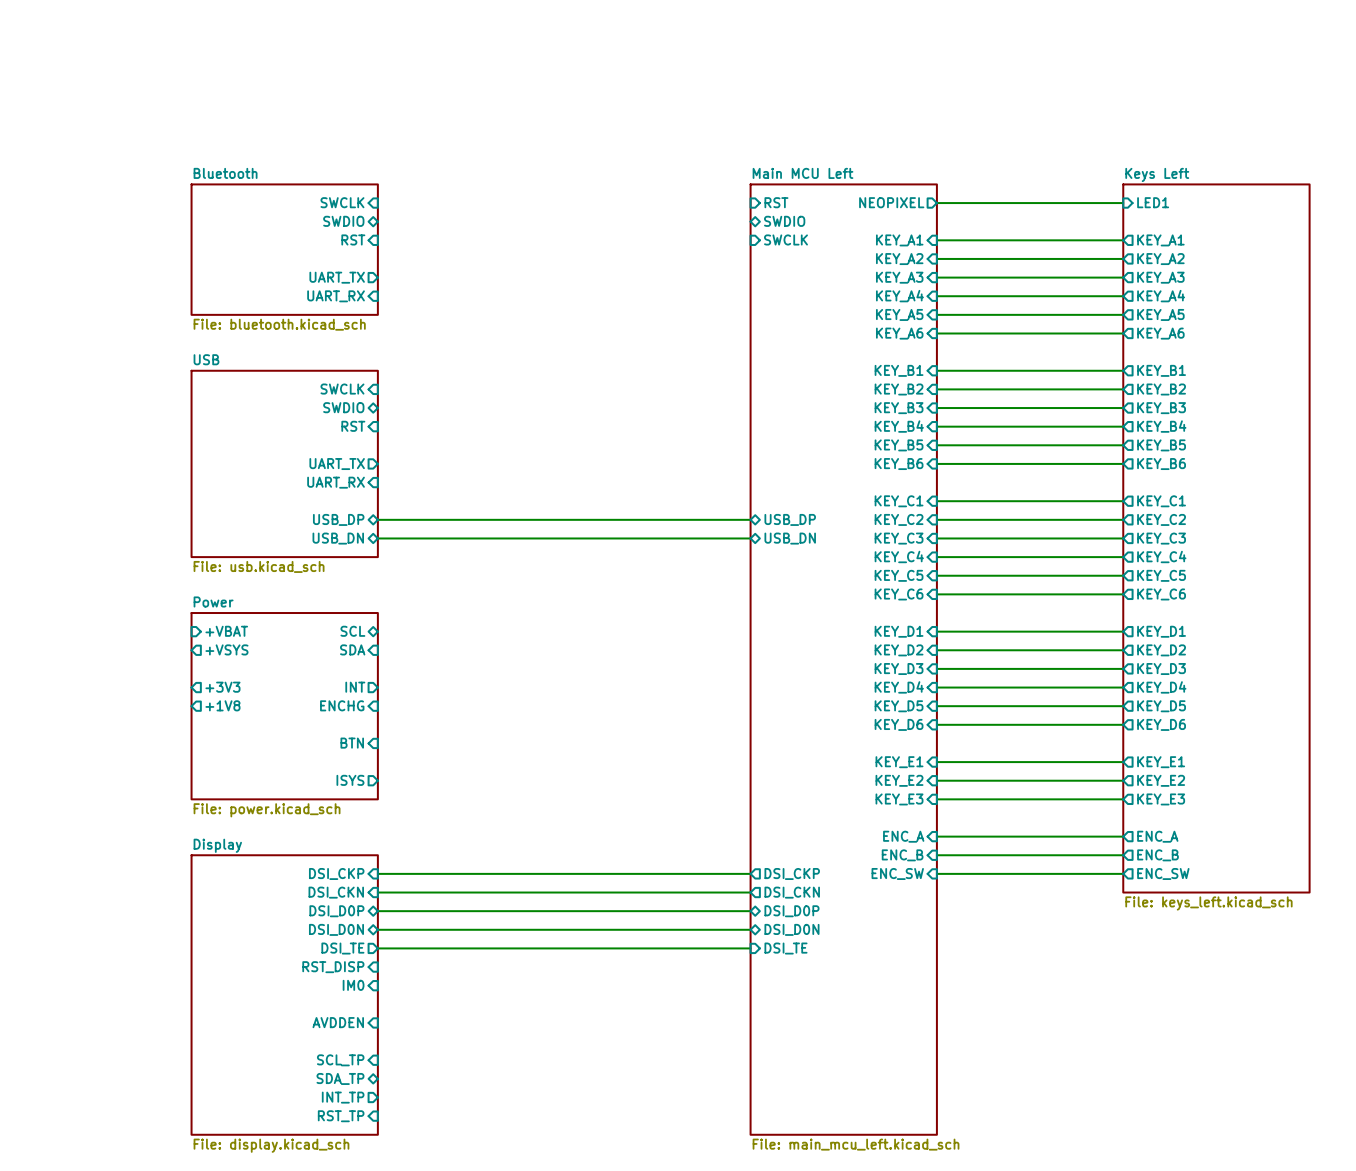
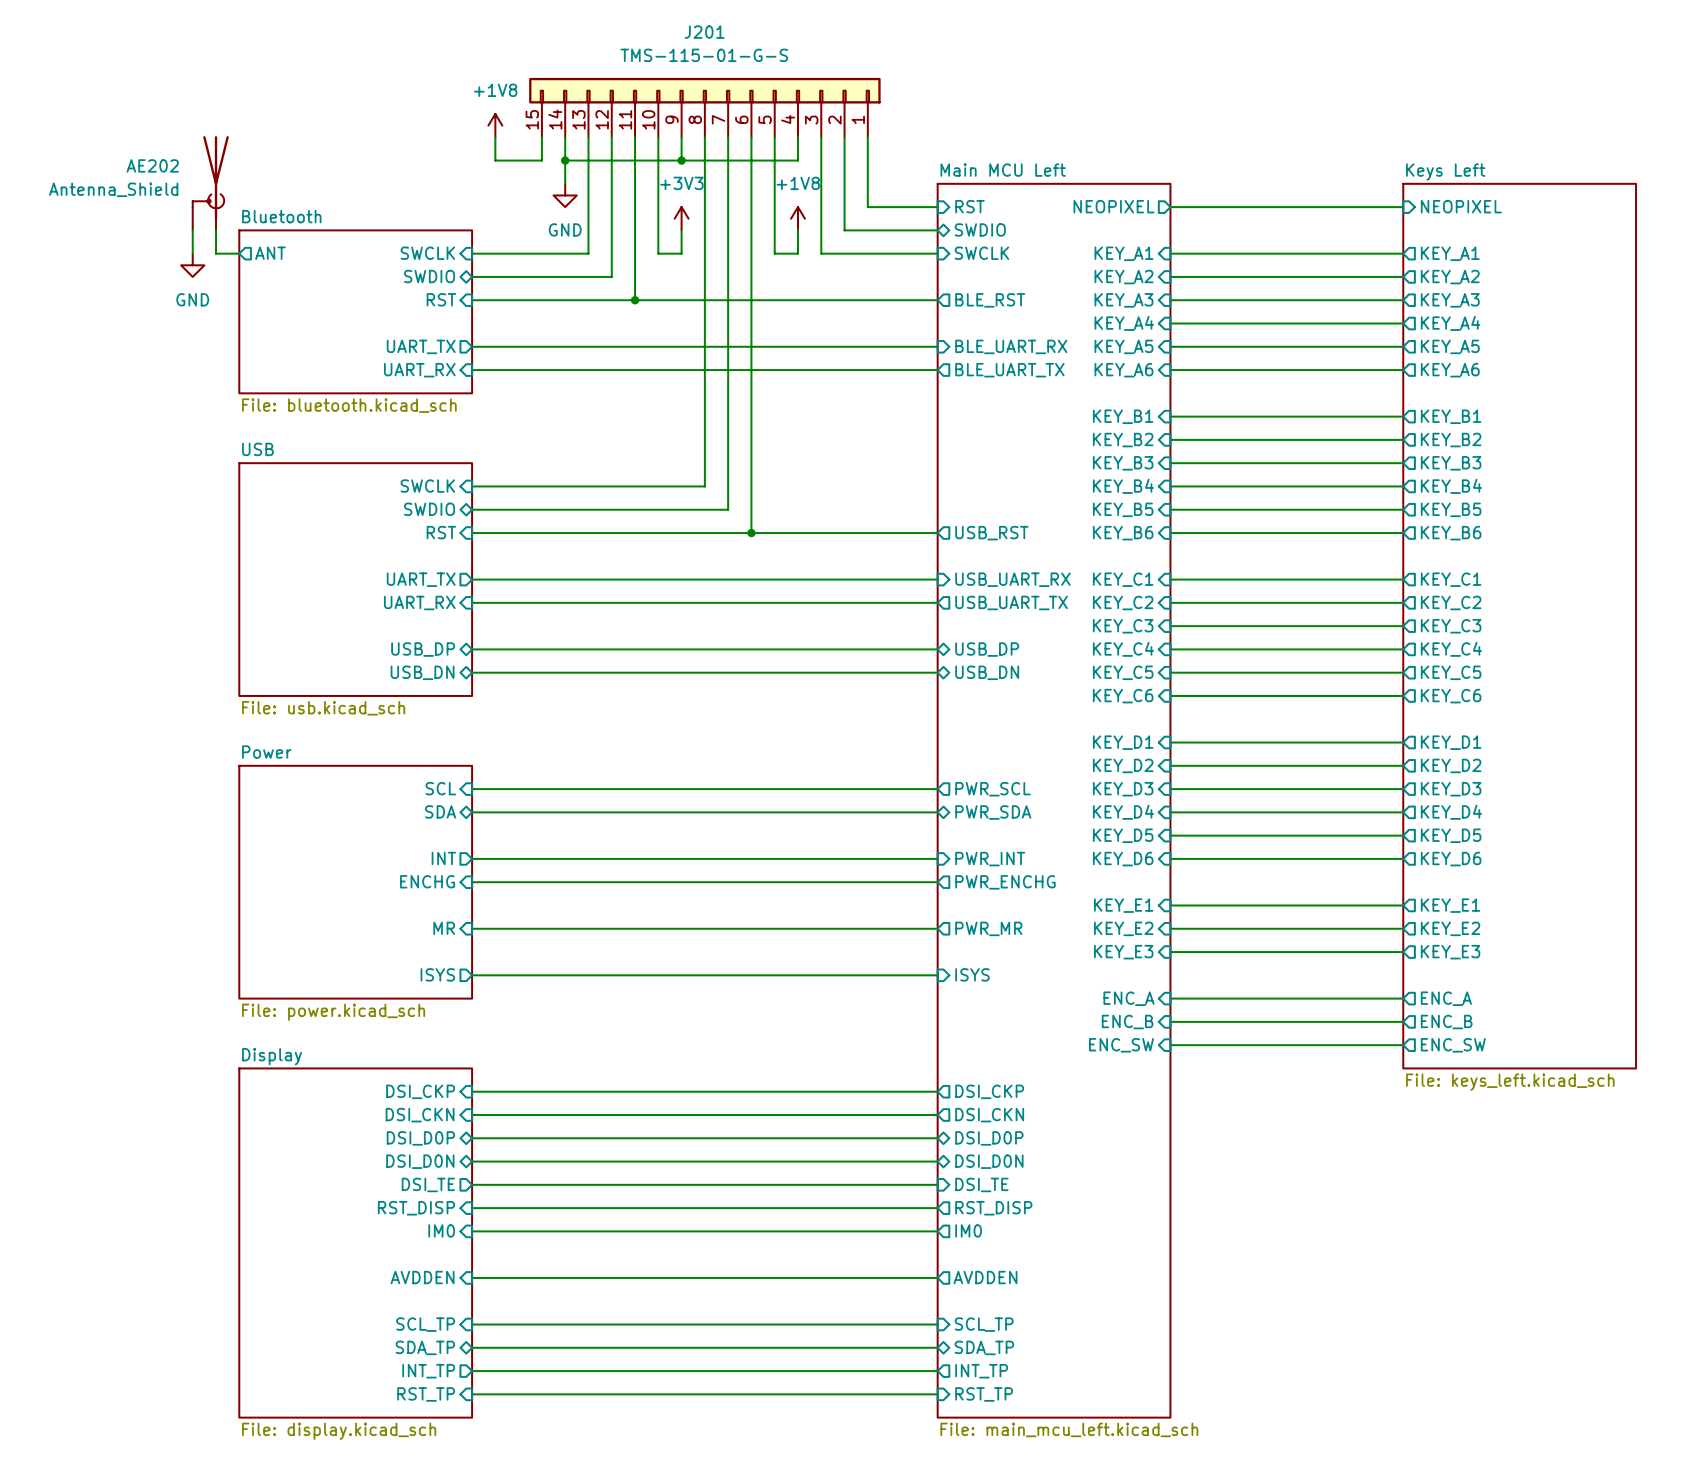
J201: none -> TMS-115-01-G-S (704, 107)
power symbol: none -> +1V8 (495, 125)
wire: none -> (495, 137) (495, 160) (541, 160) (541, 137)
wire: none -> (565, 137) (565, 183)
wire: none -> (588, 137) (588, 253) (472, 253)
wire: none -> (611, 137) (611, 276) (472, 276)
wire: none -> (635, 137) (635, 300)
wire: none -> (658, 137) (658, 253) (681, 253) (681, 230)
wire: none -> (681, 137) (681, 160)
wire: none -> (704, 137) (704, 486) (472, 486)
wire: none -> (728, 137) (728, 509) (472, 509)
wire: none -> (751, 137) (751, 533)
wire: none -> (774, 137) (774, 253) (797, 253) (797, 230)
wire: none -> (797, 137) (797, 160) (565, 160)
wire: none -> (821, 137) (821, 253) (937, 253)
wire: none -> (844, 137) (844, 230) (937, 230)
wire: none -> (867, 137) (867, 207) (937, 207)
junction: none -> (565, 160)
junction: none -> (681, 160)
AE202: none -> Antenna_Shield (210, 183)
power symbol: none -> GND (565, 195)
sheet pin: none -> RST (970, 206)
sheet pin: none -> NEOPIXEL (1114, 206)
wire: none -> (1170, 207) (1403, 207)
sheet pin: none -> NEOPIXEL (1461, 206)
power symbol: none -> +3V3 (681, 218)
power symbol: none -> +1V8 (797, 218)
wire: none -> (192, 230) (192, 253)
wire: none -> (216, 230) (216, 253) (239, 253)
sheet pin: none -> ANT (270, 253)
sheet pin: RST (776, 202) -> SWCLK (981, 253)
sheet pin shape: output (891, 202) -> input (1124, 253)
sheet pin: NEOPIXEL (891, 202) -> KEY_A1 (1124, 253)
sheet pin shape: input (1153, 202) -> output (1450, 253)
sheet pin: LED1 (1153, 202) -> KEY_A1 (1450, 253)
power symbol: none -> GND (192, 265)
sheet pin position: SWDIO (784, 221) -> SWDIO (980, 229)
sheet pin: none -> KEY_A2 (1124, 277)
wire: none -> (1170, 276) (1403, 276)
sheet pin: none -> KEY_A2 (1450, 277)
sheet pin shape: input (785, 239) -> output (990, 300)
sheet pin: SWCLK (785, 239) -> BLE_RST (990, 300)
wire: none -> (472, 300) (937, 300)
junction: none -> (635, 300)
sheet pin: KEY_A1 (899, 240) -> KEY_A3 (1124, 300)
sheet pin: KEY_A1 (1160, 240) -> KEY_A3 (1450, 300)
sheet pin: KEY_A2 (899, 259) -> KEY_A4 (1124, 323)
sheet pin: KEY_A2 (1160, 259) -> KEY_A4 (1450, 323)
wire: none -> (472, 346) (937, 346)
sheet pin: none -> BLE_UART_RX (1011, 346)
sheet pin: KEY_A3 (899, 277) -> KEY_A5 (1124, 346)
sheet pin: KEY_A3 (1160, 277) -> KEY_A5 (1450, 346)
wire: none -> (472, 370) (937, 370)
sheet pin: none -> BLE_UART_TX (1009, 370)
sheet pin: KEY_A4 (899, 296) -> KEY_A6 (1124, 370)
sheet pin: KEY_A4 (1161, 296) -> KEY_A6 (1450, 370)
sheet pin: KEY_A5 (899, 314) -> none
wire: (936, 314) (1123, 314) -> (1170, 439) (1403, 439)
sheet pin: KEY_A5 (1160, 314) -> none
sheet pin: KEY_A6 (899, 333) -> KEY_B1 (1123, 416)
sheet pin: KEY_A6 (1160, 333) -> KEY_B1 (1451, 416)
sheet pin: none -> KEY_B2 (1123, 440)
sheet pin: none -> KEY_B2 (1451, 440)
sheet pin: KEY_B1 (899, 370) -> KEY_B3 (1123, 463)
sheet pin: KEY_B1 (1161, 370) -> KEY_B3 (1451, 463)
sheet pin: KEY_B2 (899, 389) -> KEY_B4 (1123, 486)
sheet pin: KEY_B2 (1161, 389) -> KEY_B4 (1451, 486)
sheet pin: KEY_B3 (899, 408) -> KEY_B5 (1123, 509)
sheet pin: KEY_B3 (1161, 408) -> KEY_B5 (1451, 509)
wire: none -> (472, 533) (937, 533)
junction: none -> (751, 533)
sheet pin: none -> USB_RST (991, 533)
sheet pin: KEY_B4 (899, 426) -> KEY_B6 (1123, 533)
sheet pin: KEY_B4 (1161, 426) -> KEY_B6 (1451, 533)
sheet pin: KEY_B5 (899, 445) -> none
wire: (936, 445) (1123, 445) -> (1170, 602) (1403, 602)
sheet pin: KEY_B5 (1161, 445) -> none
wire: none -> (472, 579) (937, 579)
sheet pin: none -> USB_UART_RX (1012, 579)
sheet pin: KEY_B6 (899, 464) -> KEY_C1 (1123, 579)
sheet pin: KEY_B6 (1161, 464) -> KEY_C1 (1451, 579)
wire: none -> (472, 602) (937, 602)
sheet pin: none -> USB_UART_TX (1011, 602)
sheet pin: none -> KEY_C2 (1123, 602)
sheet pin: none -> KEY_C2 (1451, 602)
sheet pin: KEY_C1 (899, 501) -> KEY_C3 (1123, 626)
sheet pin: KEY_C1 (1161, 501) -> KEY_C3 (1451, 626)
sheet pin: KEY_C2 (899, 519) -> KEY_C4 (1123, 649)
sheet pin: KEY_C2 (1161, 519) -> KEY_C4 (1451, 649)
sheet pin: KEY_C3 (899, 538) -> KEY_C5 (1123, 672)
sheet pin: KEY_C3 (1161, 538) -> KEY_C5 (1451, 672)
sheet Keys Left position: (1216, 538) -> (1519, 626)
sheet pin: KEY_C4 (899, 556) -> KEY_C6 (1123, 696)
sheet pin: KEY_C4 (1161, 556) -> KEY_C6 (1451, 696)
sheet pin: KEY_C5 (899, 575) -> none
wire: (936, 575) (1123, 575) -> (1170, 765) (1403, 765)
sheet pin: KEY_C5 (1161, 575) -> none
sheet pin: KEY_C6 (899, 594) -> KEY_D1 (1123, 742)
sheet pin: KEY_C6 (1161, 594) -> KEY_D1 (1451, 742)
sheet pin: none -> KEY_D2 (1123, 765)
sheet pin: none -> KEY_D2 (1451, 765)
sheet pin: +VBAT (226, 631) -> none
sheet pin shape: bidirectional (352, 631) -> input (440, 788)
wire: none -> (472, 789) (937, 789)
sheet pin: none -> PWR_SCL (993, 789)
sheet pin: KEY_D1 (899, 631) -> KEY_D3 (1123, 789)
sheet pin: KEY_D1 (1161, 631) -> KEY_D3 (1451, 789)
sheet Main MCU Left: none -> File: main_mcu_left.kicad_sch (1054, 800)
sheet pin: +VSYS (226, 649) -> none
sheet pin shape: input (352, 649) -> bidirectional (440, 811)
wire: none -> (472, 812) (937, 812)
sheet pin: none -> PWR_SDA (993, 812)
sheet pin: KEY_D2 (899, 650) -> KEY_D4 (1123, 812)
sheet pin: KEY_D2 (1161, 650) -> KEY_D4 (1451, 812)
sheet Main MCU Left: File: main_mcu_left.kicad_sch (843, 659) -> none
sheet pin: KEY_D3 (899, 669) -> KEY_D5 (1123, 835)
sheet pin: KEY_D3 (1161, 669) -> KEY_D5 (1451, 835)
sheet pin: +3V3 (222, 687) -> none
wire: none -> (472, 858) (937, 858)
sheet pin: none -> PWR_INT (990, 859)
sheet pin: KEY_D4 (899, 687) -> KEY_D6 (1123, 859)
sheet pin: KEY_D4 (1161, 687) -> KEY_D6 (1451, 859)
sheet pin: +1V8 (222, 705) -> none
wire: none -> (472, 882) (937, 882)
sheet pin: none -> PWR_ENCHG (1005, 882)
sheet pin: KEY_D5 (899, 706) -> none
wire: (936, 706) (1123, 706) -> (1170, 928) (1403, 928)
sheet pin: KEY_D5 (1161, 706) -> none
sheet pin: KEY_D6 (899, 724) -> KEY_E1 (1123, 905)
sheet pin: KEY_D6 (1161, 724) -> KEY_E1 (1450, 905)
sheet pin: BTN (352, 743) -> MR (444, 928)
wire: none -> (472, 928) (937, 928)
sheet pin: none -> PWR_MR (988, 928)
sheet pin: KEY_E1 (899, 762) -> KEY_E3 (1123, 952)
sheet pin: KEY_E1 (1161, 762) -> KEY_E3 (1450, 952)
wire: none -> (472, 975) (937, 975)
sheet pin: none -> ISYS (972, 974)
sheet pin position: KEY_E2 (899, 780) -> KEY_E2 (1123, 928)
wire: (936, 780) (1123, 780) -> (1170, 1021) (1403, 1021)
sheet pin position: KEY_E2 (1161, 780) -> KEY_E2 (1450, 928)
sheet pin: KEY_E3 (899, 799) -> ENC_A (1128, 998)
sheet pin: KEY_E3 (1161, 799) -> ENC_A (1446, 998)
sheet pin: ENC_A (903, 836) -> ENC_SW (1121, 1045)
sheet pin: ENC_A (1157, 836) -> ENC_SW (1453, 1045)
sheet pin position: ENC_B (902, 855) -> ENC_B (1127, 1022)
wire: (936, 855) (1123, 855) -> none
sheet pin position: ENC_B (1158, 855) -> ENC_B (1446, 1022)
sheet pin: ENC_SW (897, 873) -> none
wire: (936, 873) (1123, 873) -> none
sheet pin: ENC_SW (1163, 873) -> none
wire: none -> (472, 1208) (937, 1208)
sheet pin: none -> RST_DISP (993, 1208)
wire: none -> (472, 1231) (937, 1231)
sheet pin: none -> IM0 (968, 1230)
wire: none -> (472, 1277) (937, 1277)
sheet pin: none -> AVDDEN (985, 1277)
wire: none -> (472, 1324) (937, 1324)
sheet pin: none -> SCL_TP (984, 1324)
wire: none -> (472, 1347) (937, 1347)
sheet pin: none -> SDA_TP (984, 1347)
wire: none -> (472, 1371) (937, 1371)
sheet pin: none -> INT_TP (981, 1371)
wire: none -> (472, 1394) (937, 1394)
sheet pin: none -> RST_TP (984, 1394)

